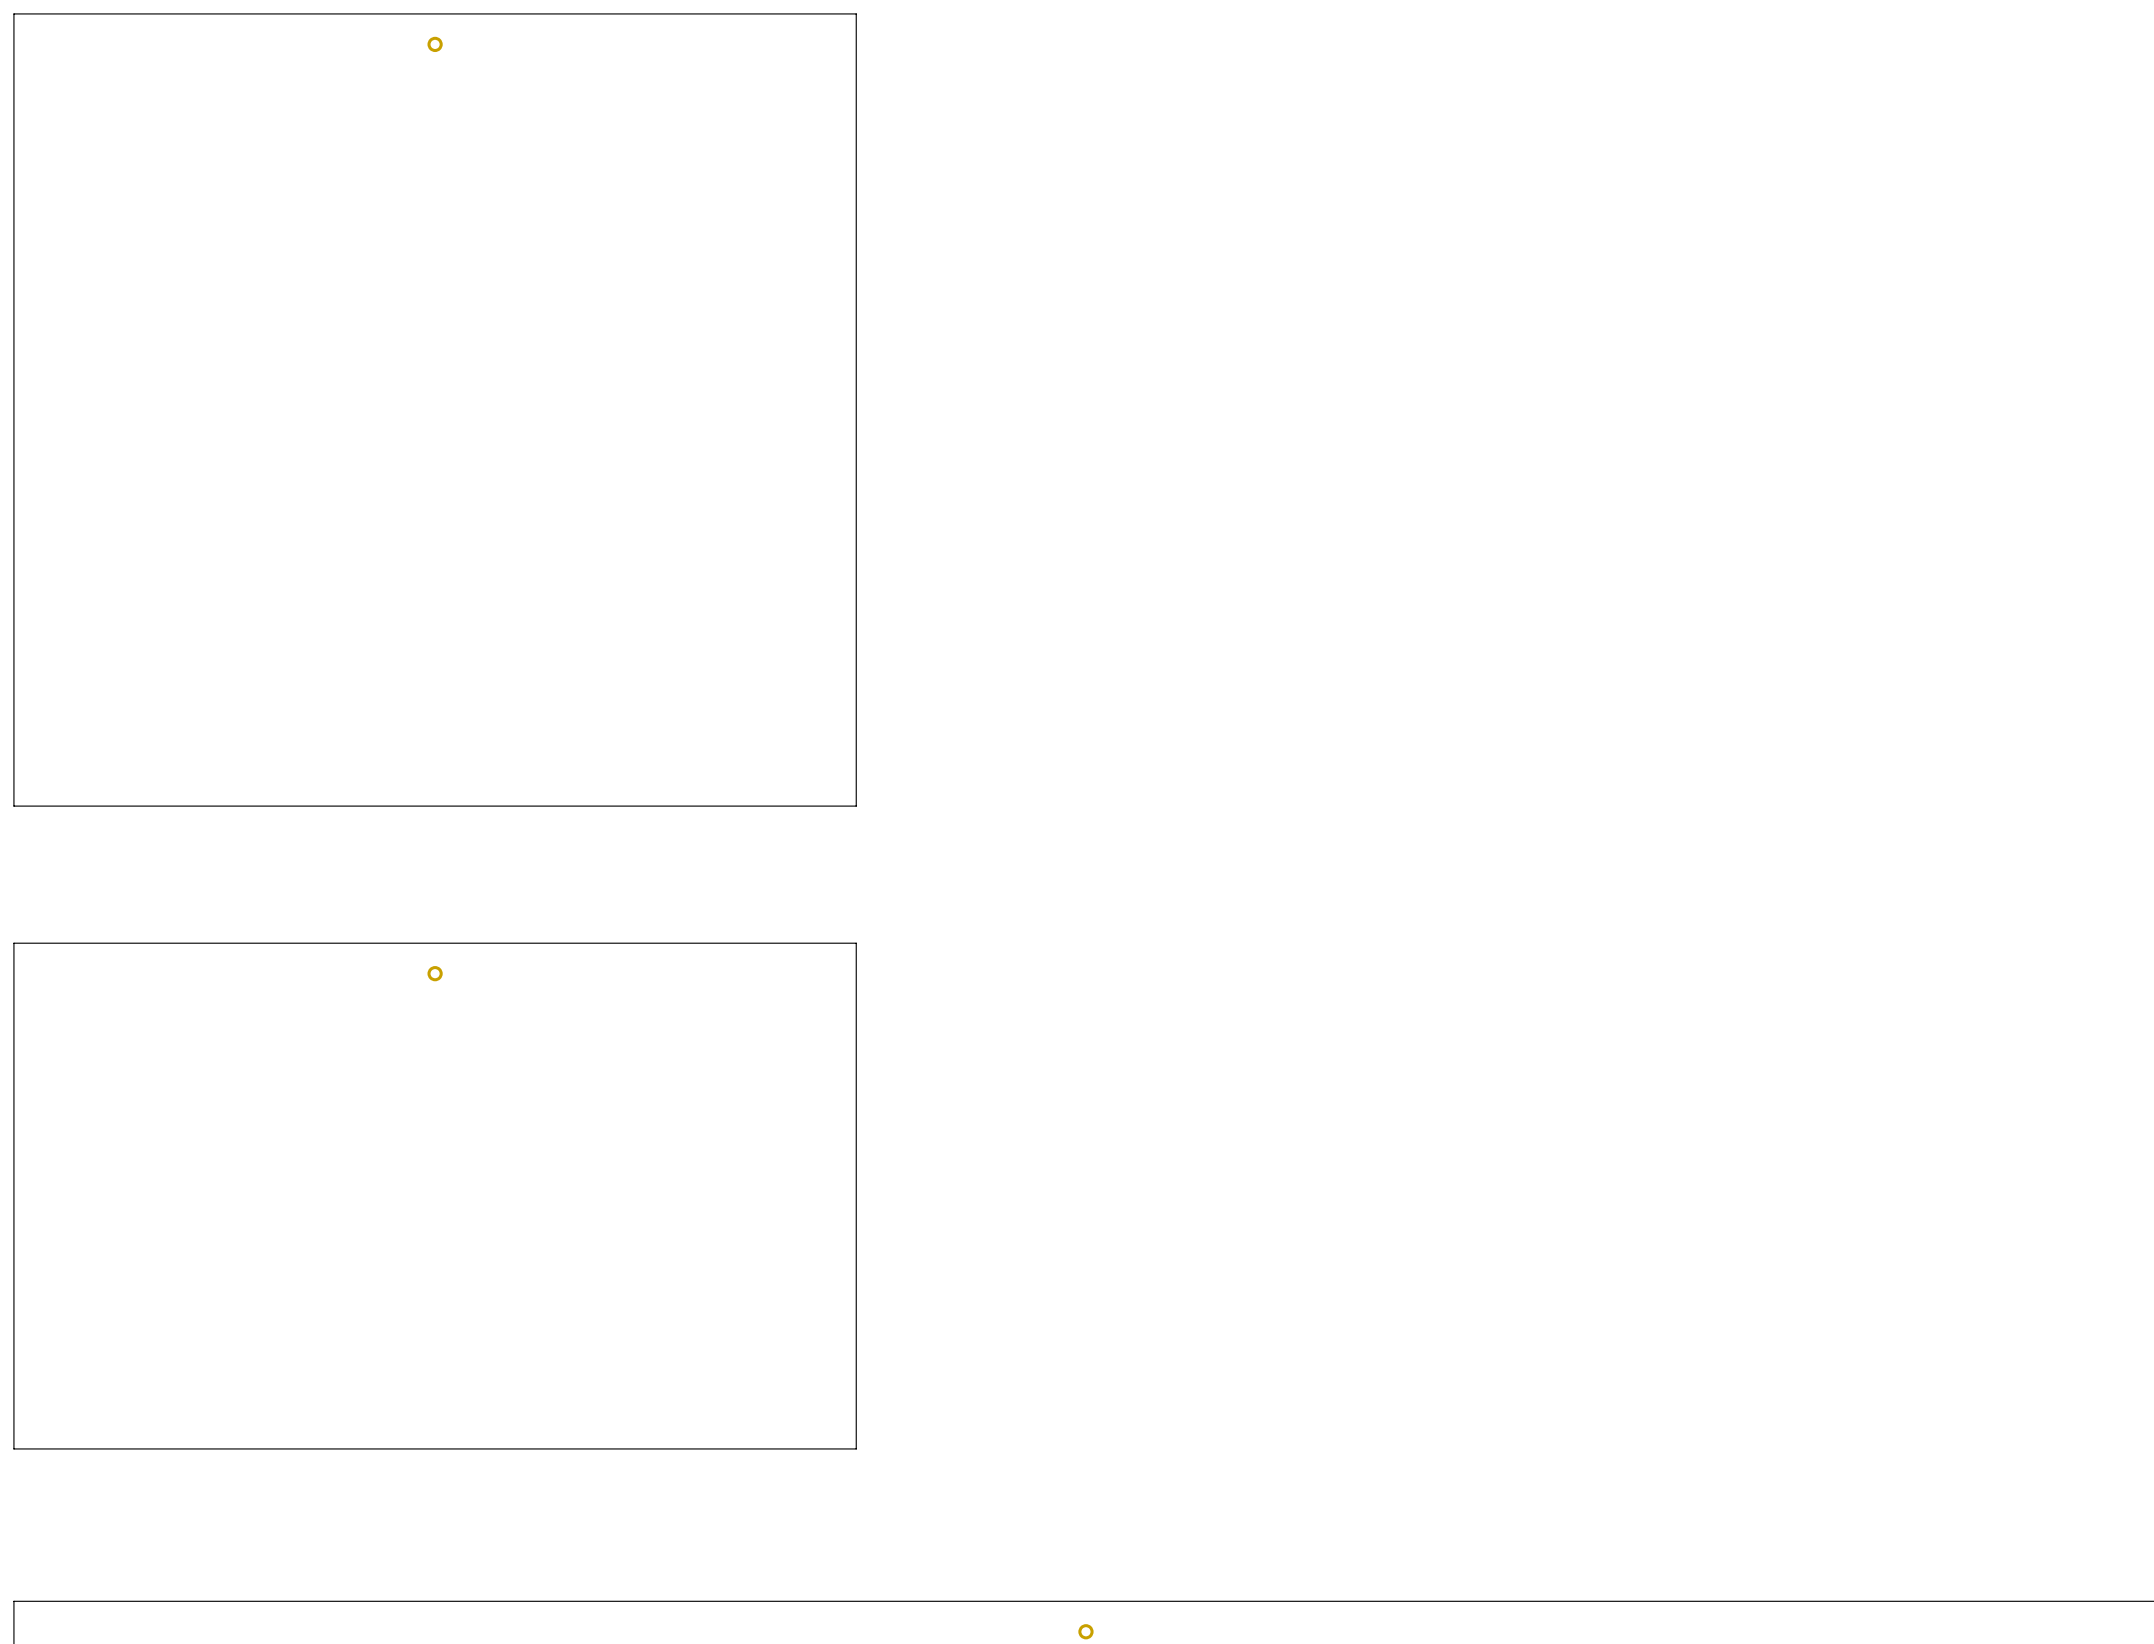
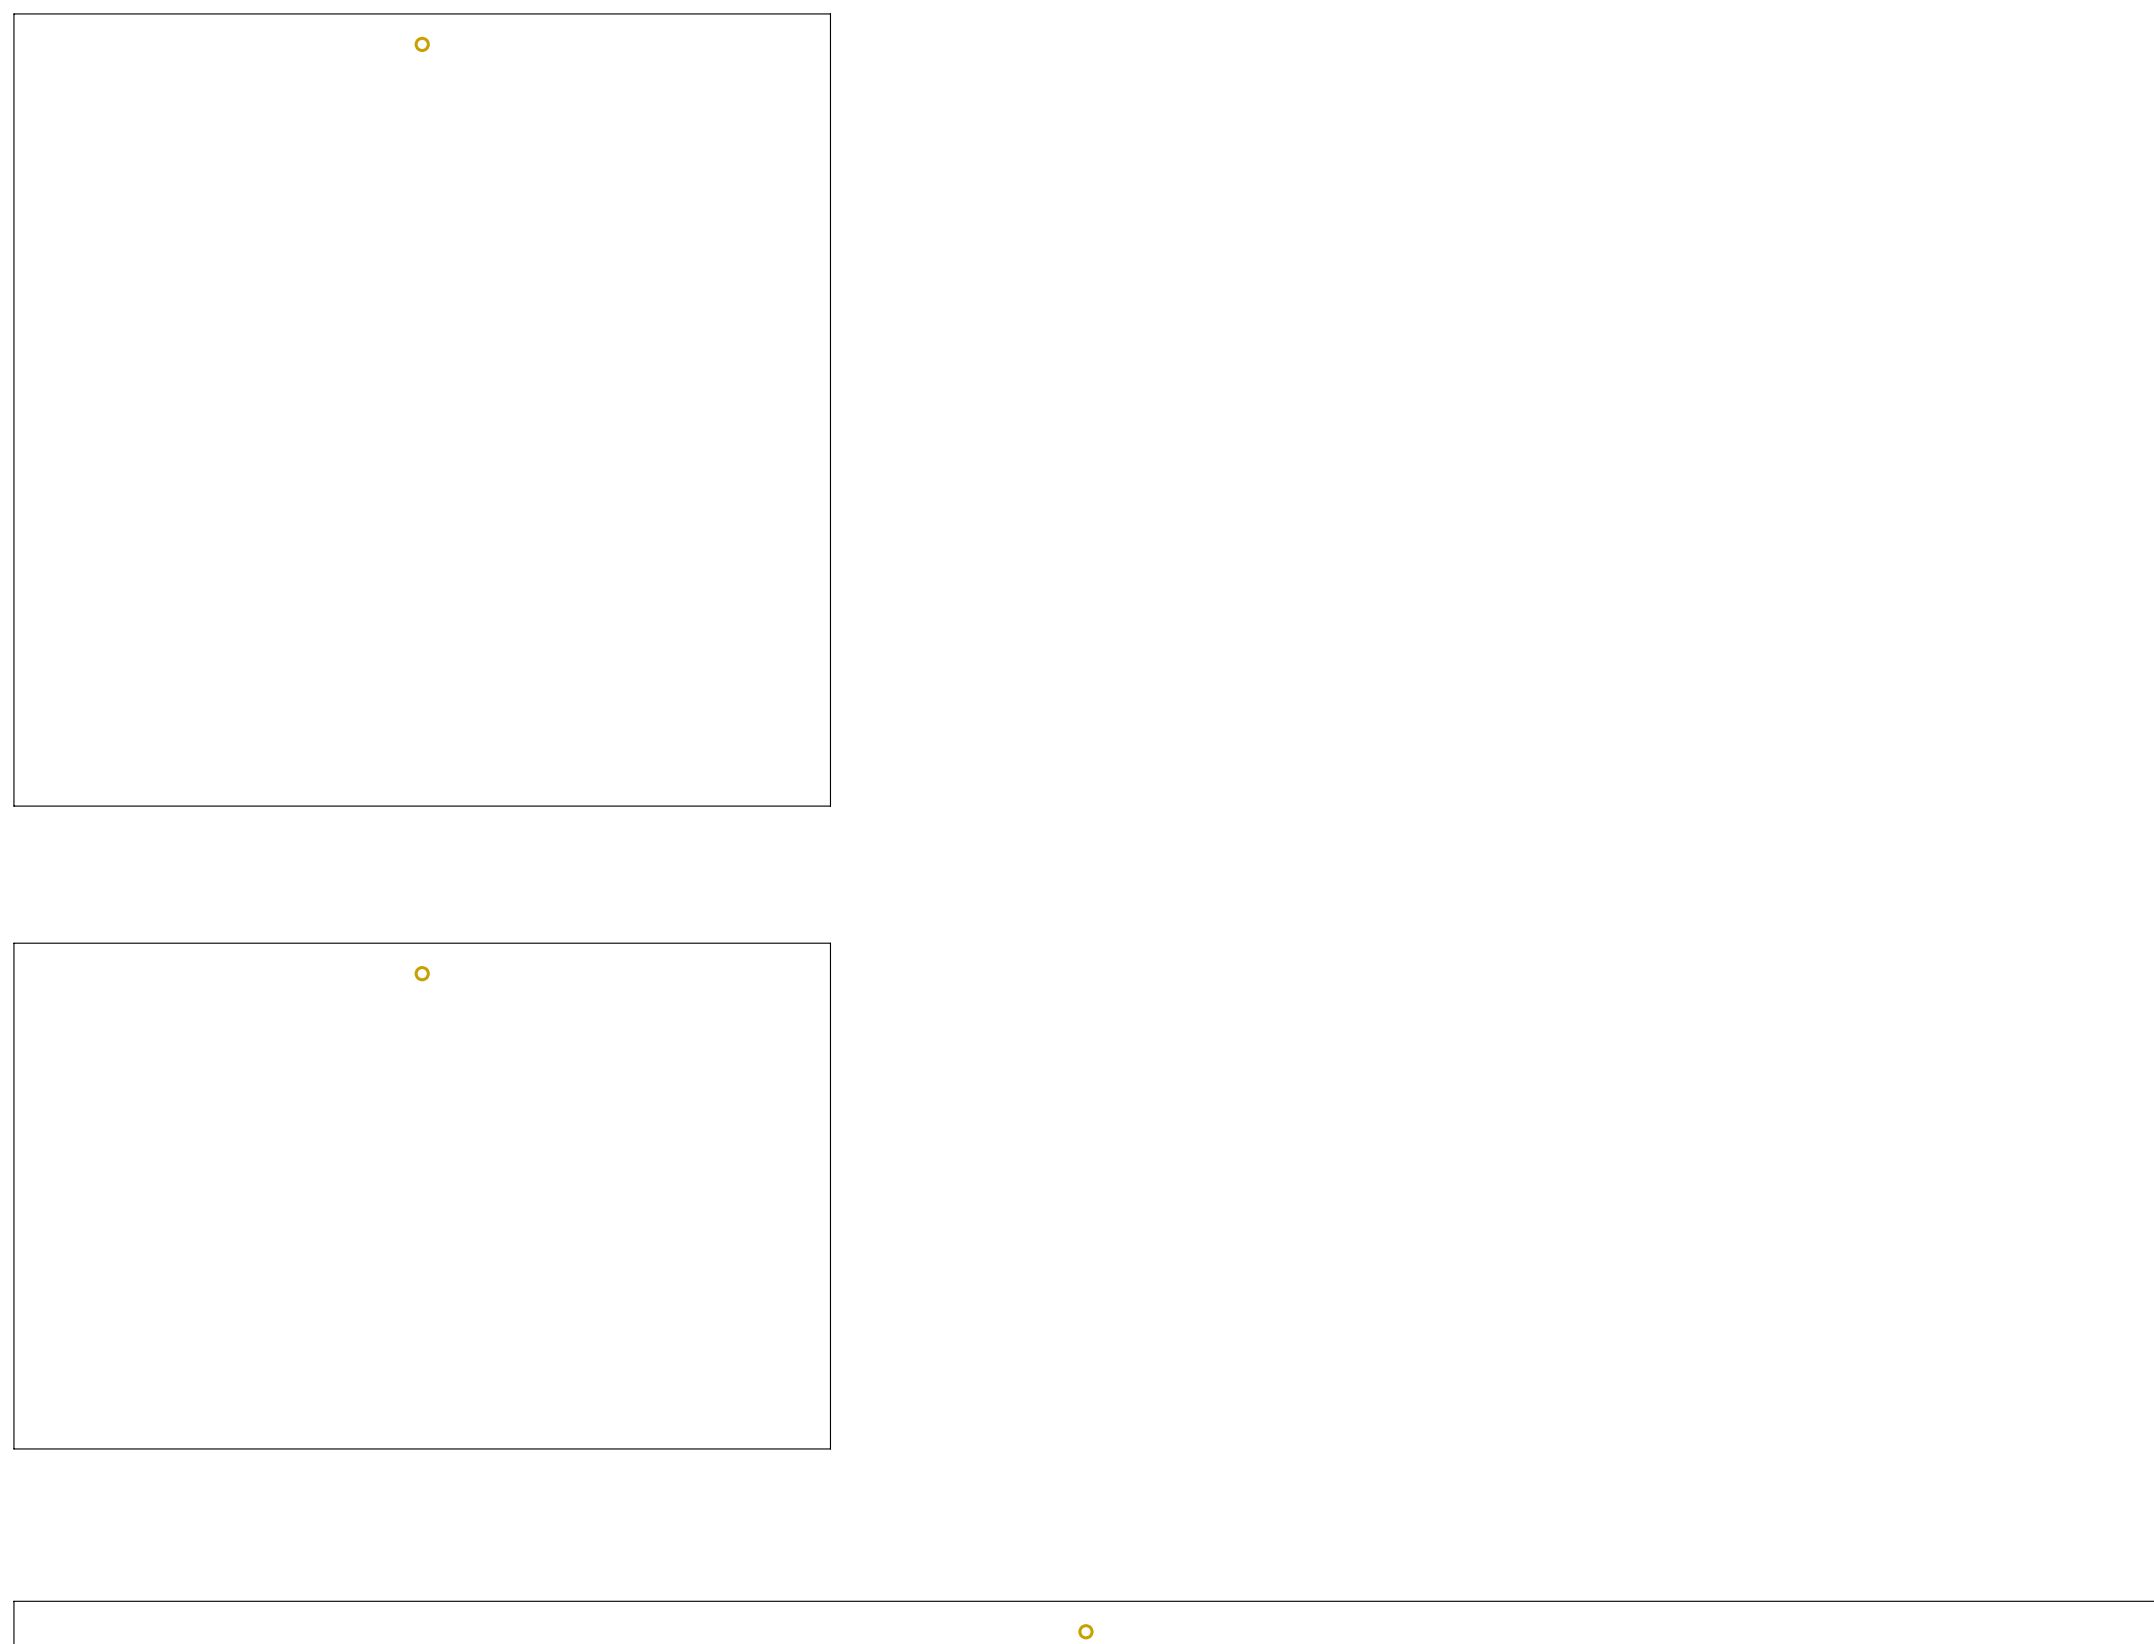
board edge: (830, 13) (856, 13) (856, 806) (830, 806) -> (830, 13) (830, 806)
part position: (435, 44) -> (422, 44)
board edge: (830, 943) (856, 943) (856, 1448) (830, 1448) -> (830, 943) (830, 1448)
part position: (435, 973) -> (422, 973)

